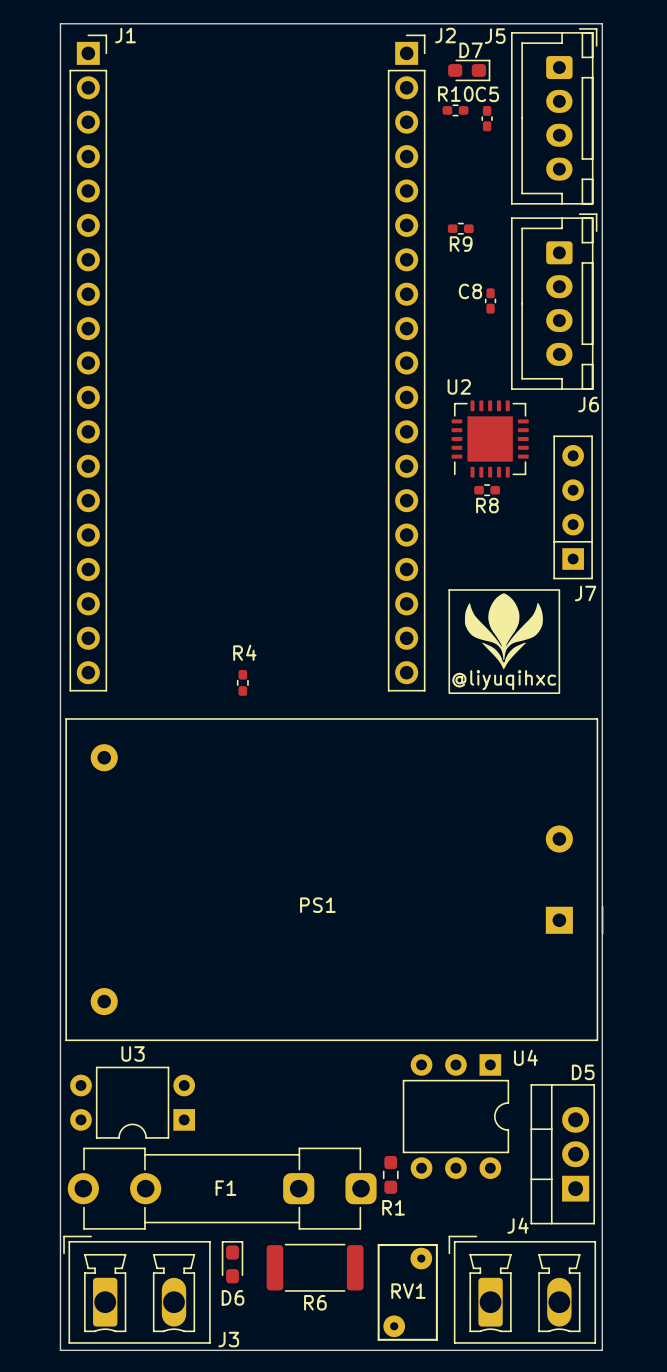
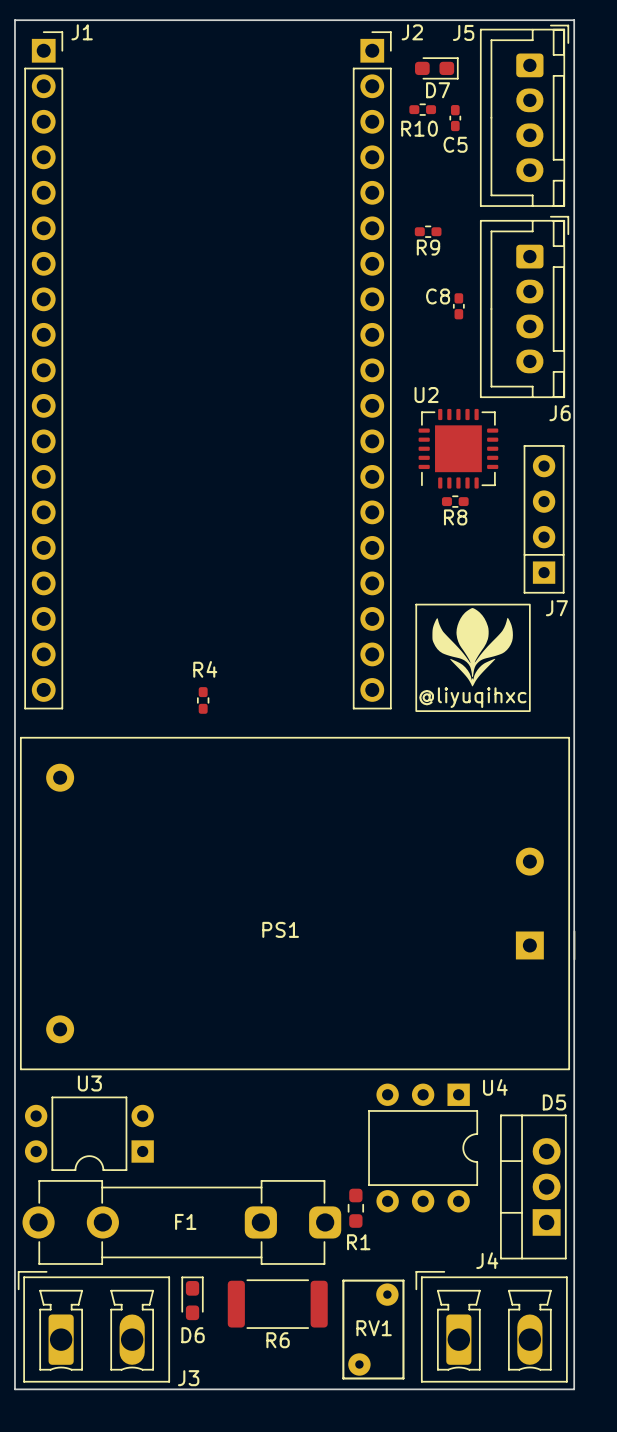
D7 name position: D7 (471, 50) -> D7 (438, 90)
R10 name position: R10 (455, 94) -> R10 (419, 128)
C5 name position: C5 (487, 94) -> C5 (455, 144)

